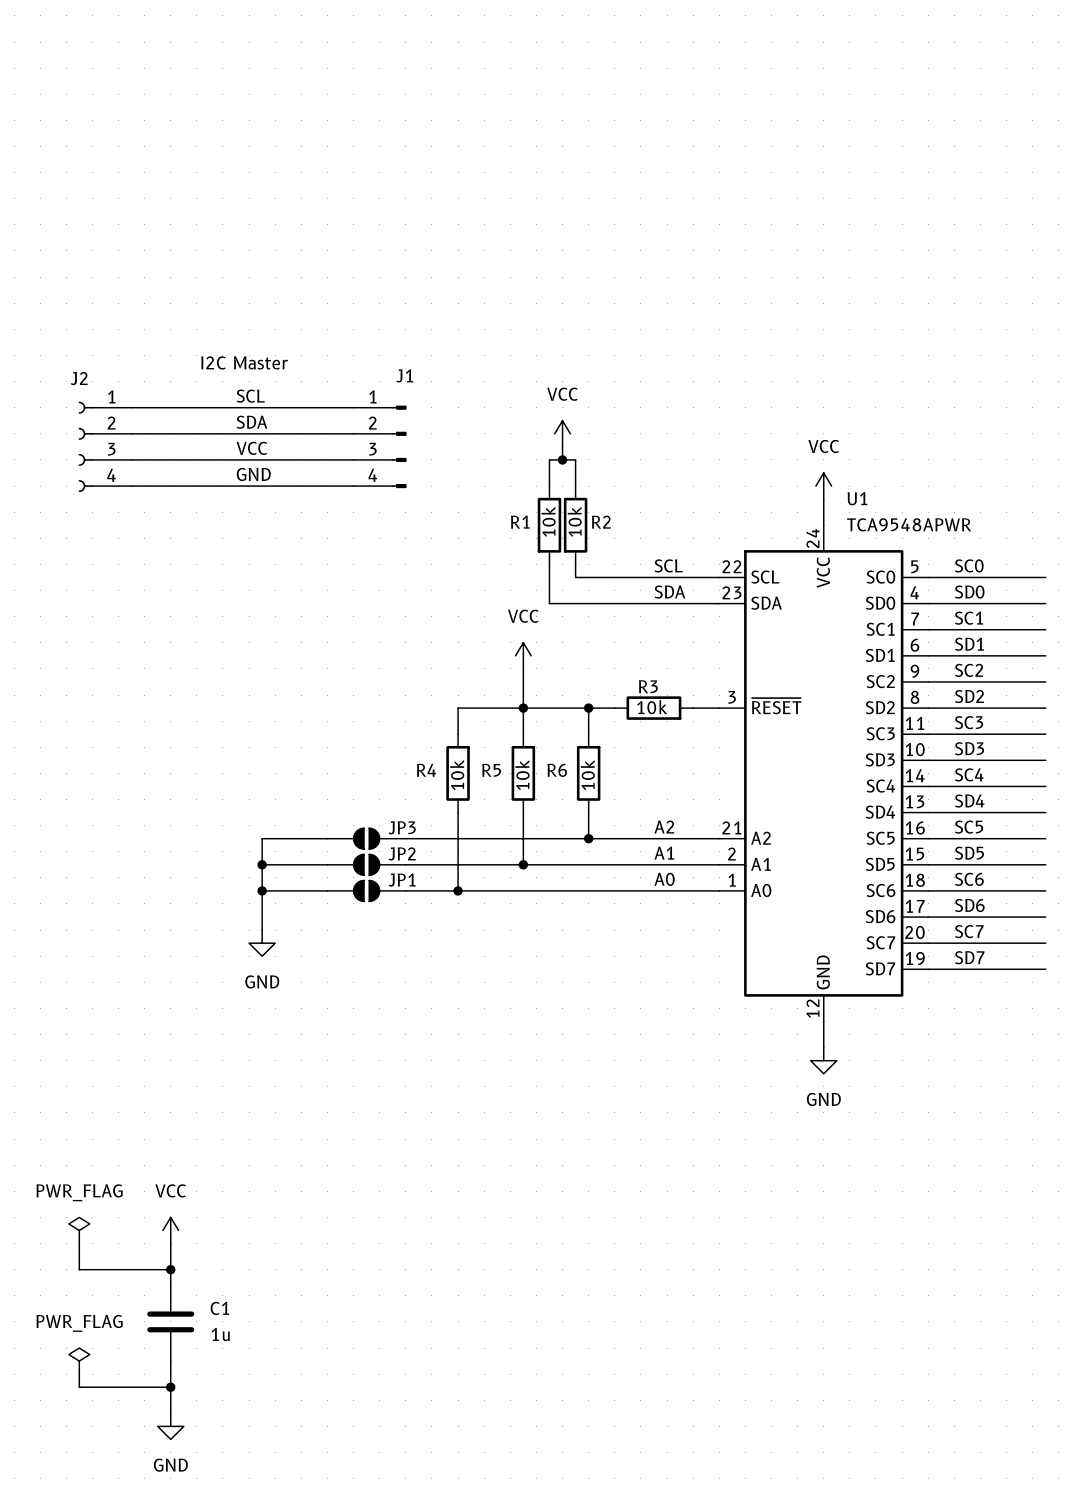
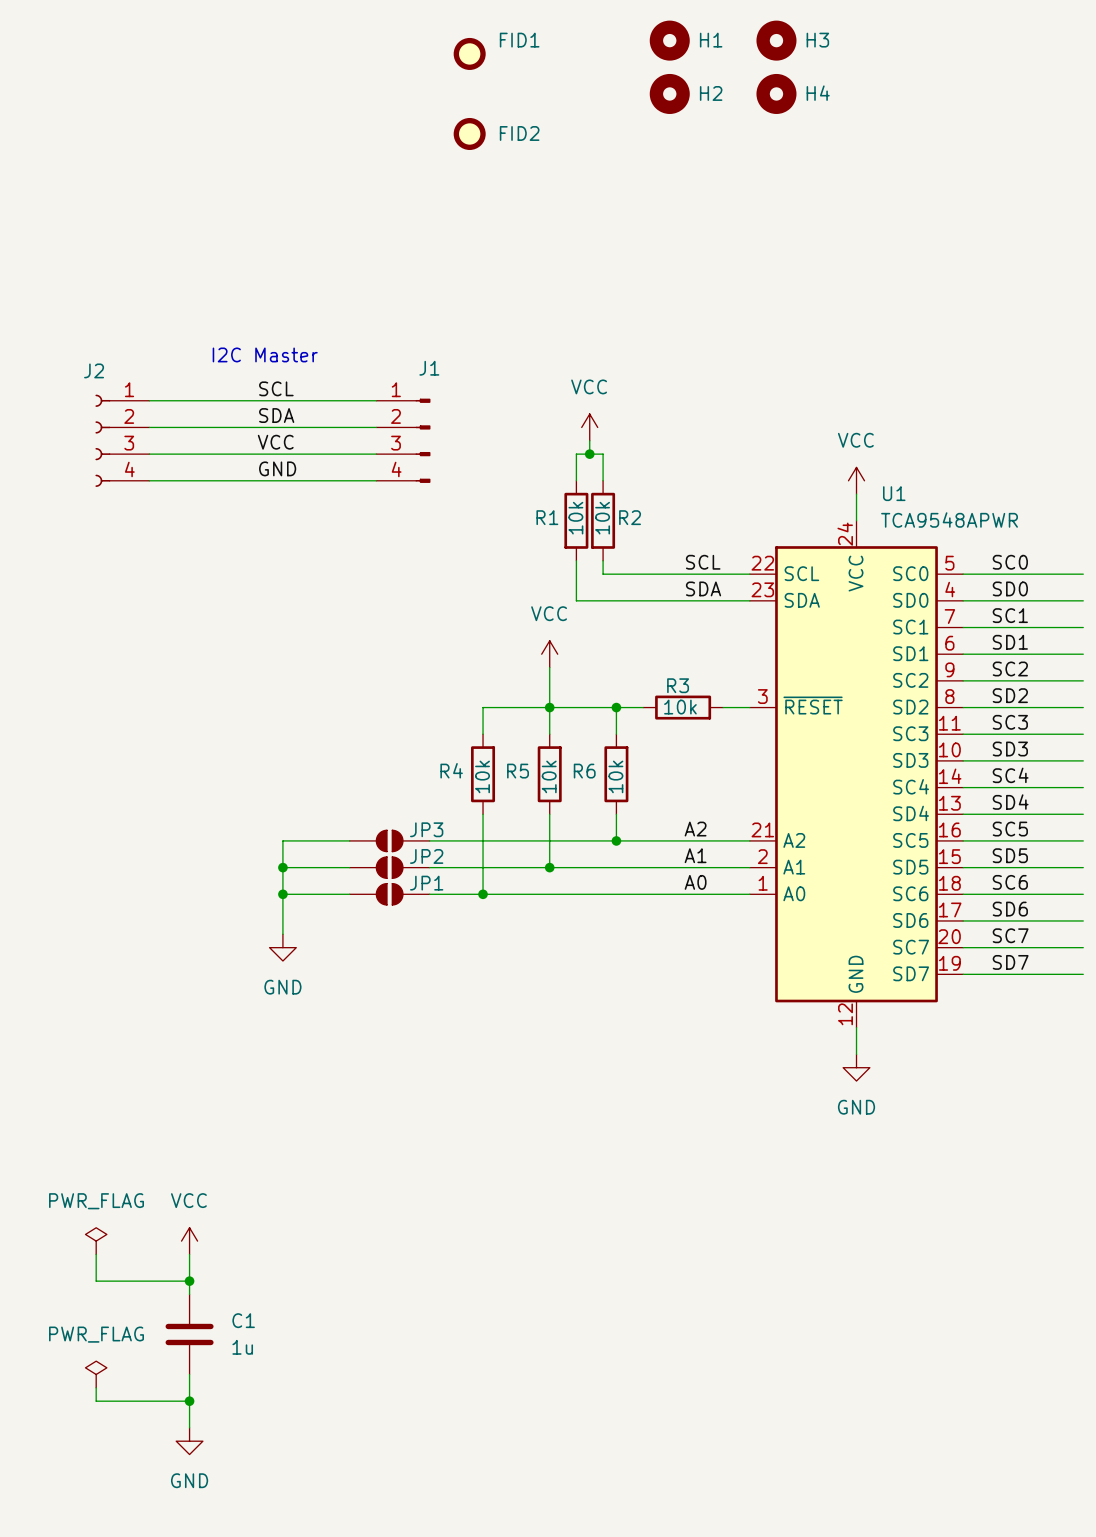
H1: none -> (669, 40)
H3: none -> (776, 40)
FID1: none -> (469, 53)
H2: none -> (669, 93)
H4: none -> (776, 93)
FID2: none -> (469, 133)

